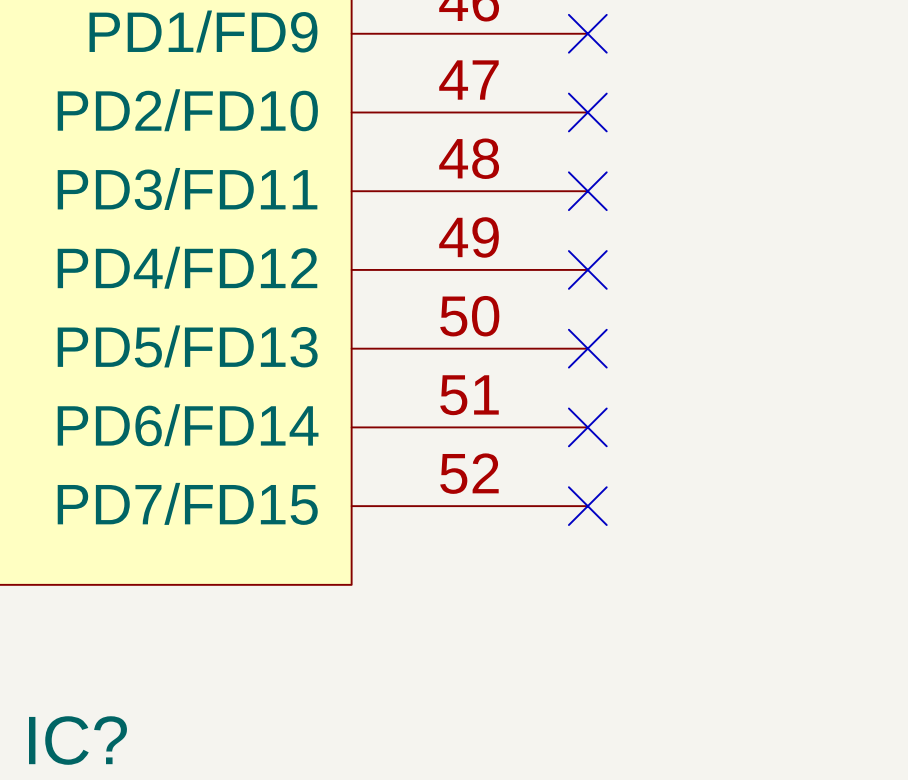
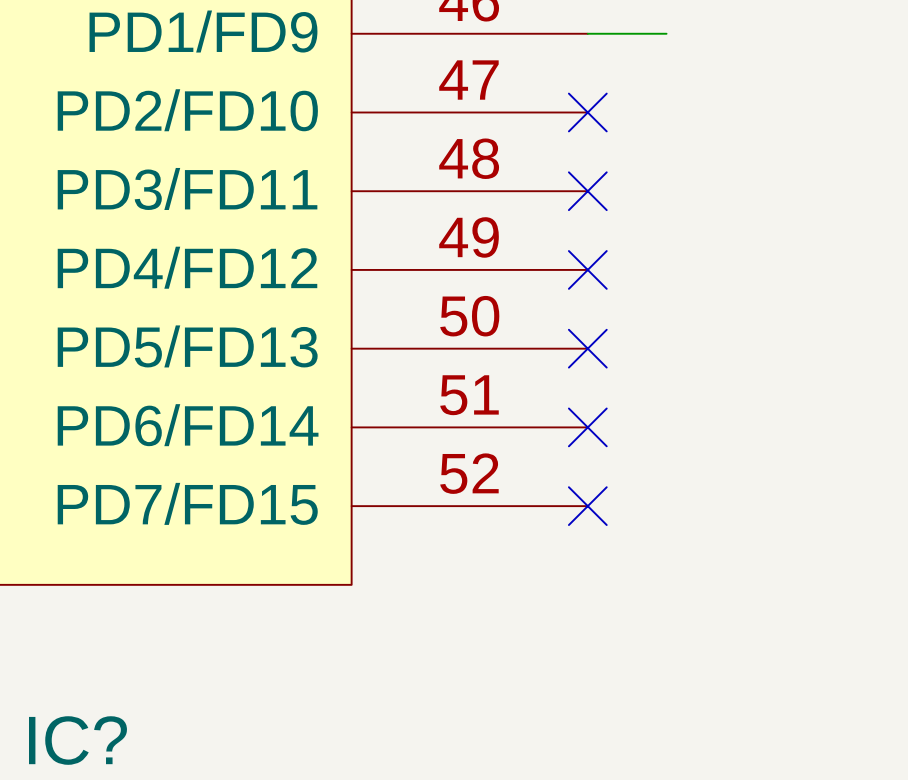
wire: none -> (587, 33) (666, 33)
no-connect mark: (587, 33) -> none

